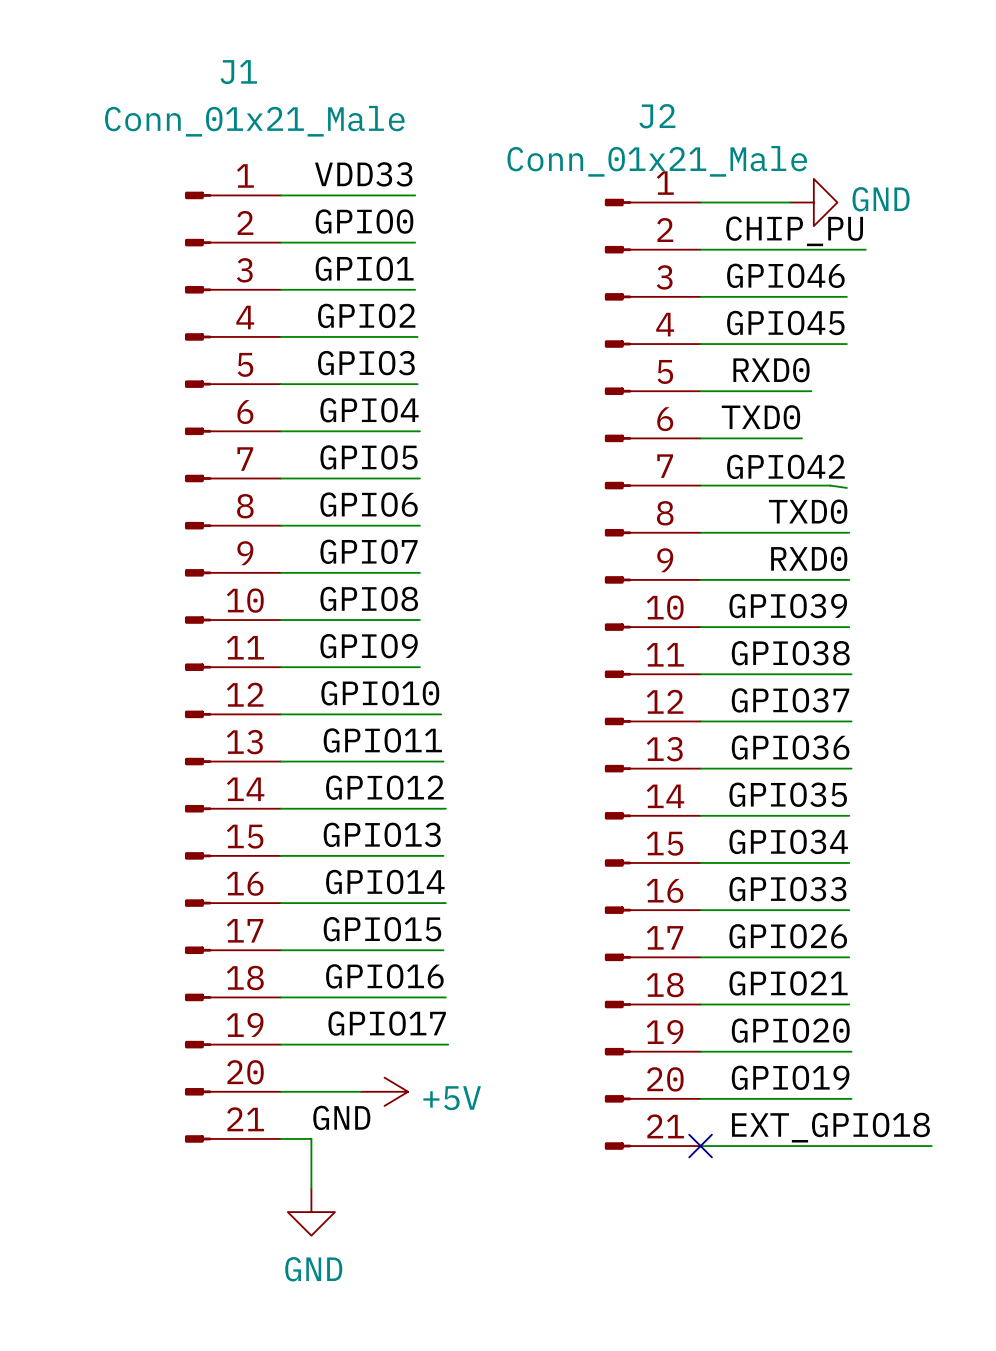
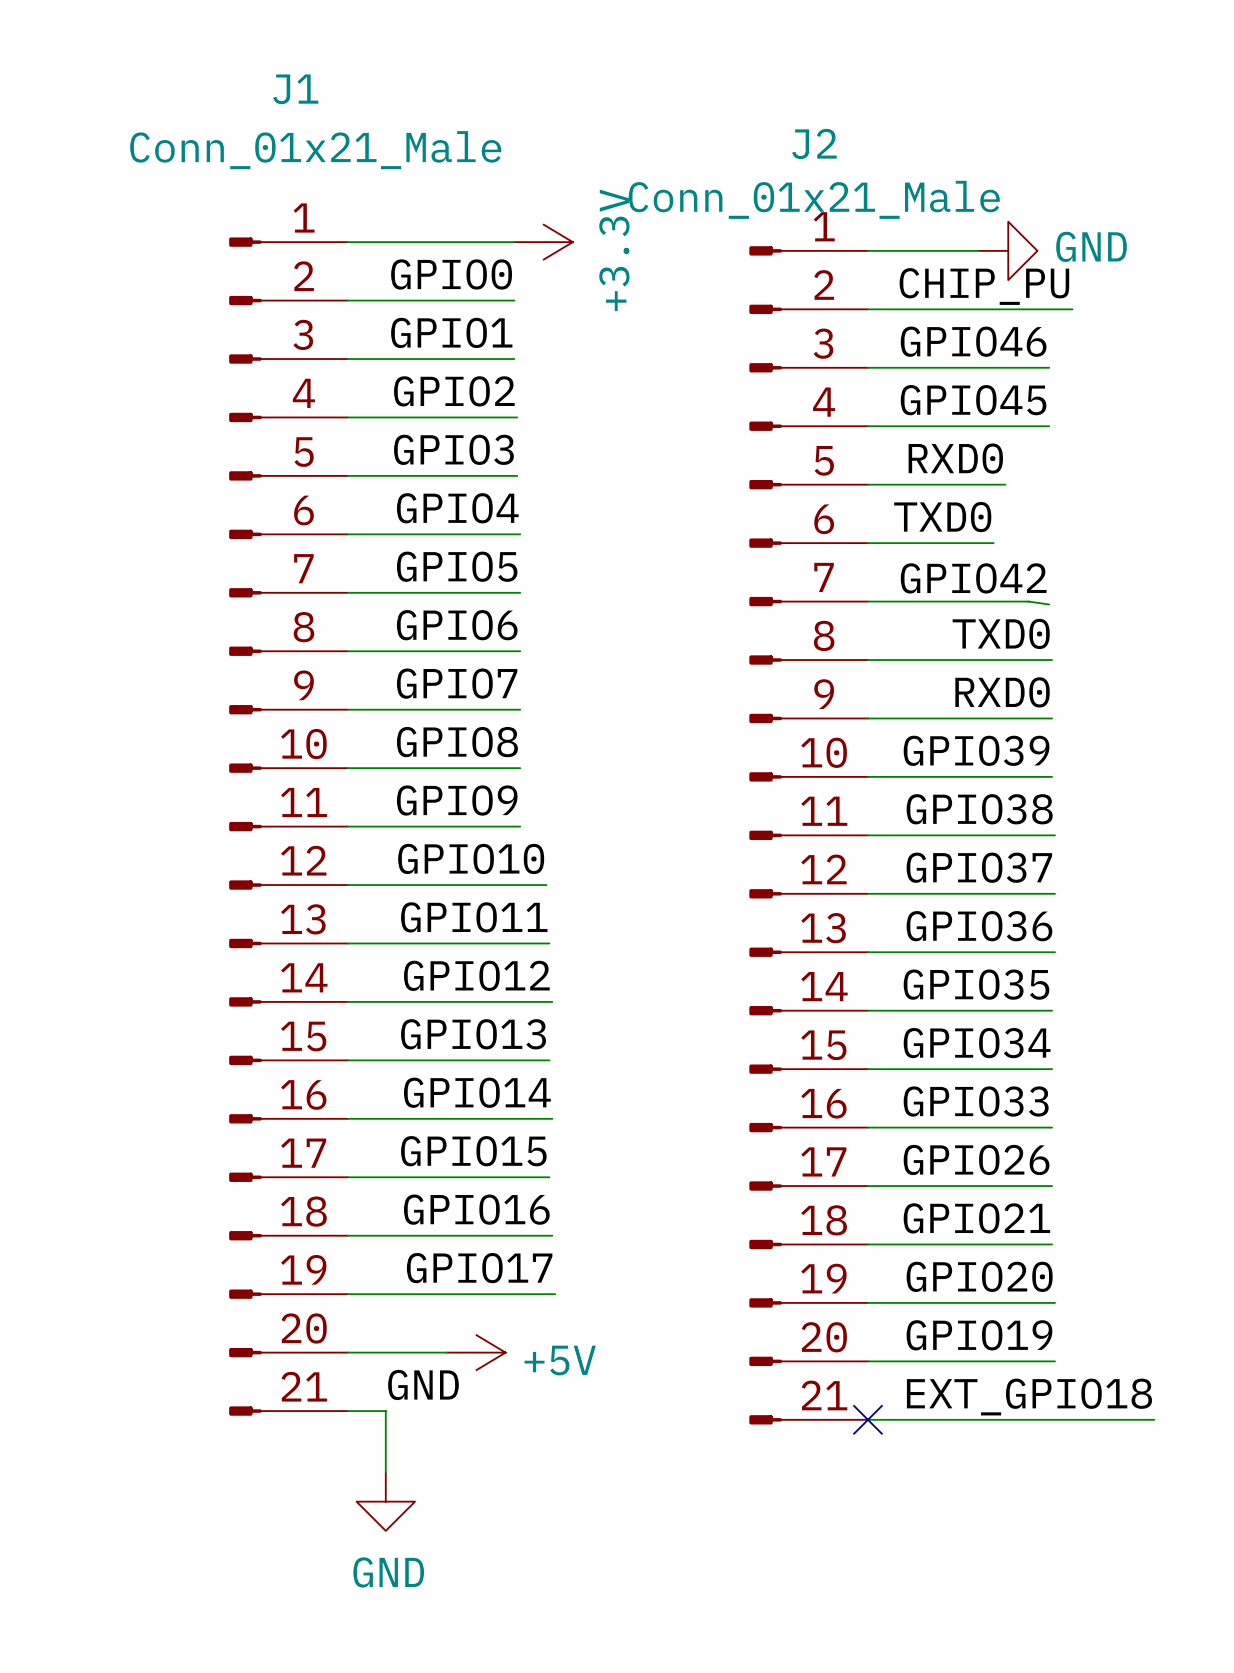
label: VDD33 (363, 174) -> none
power symbol: none -> +3.3V (543, 242)

